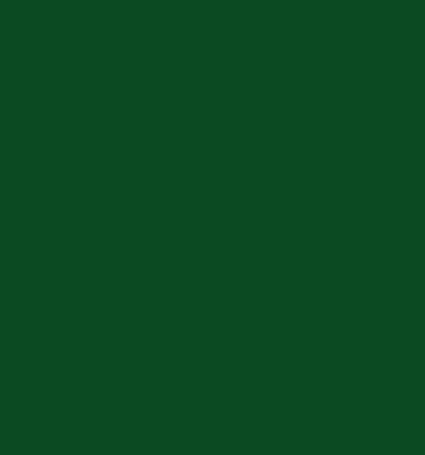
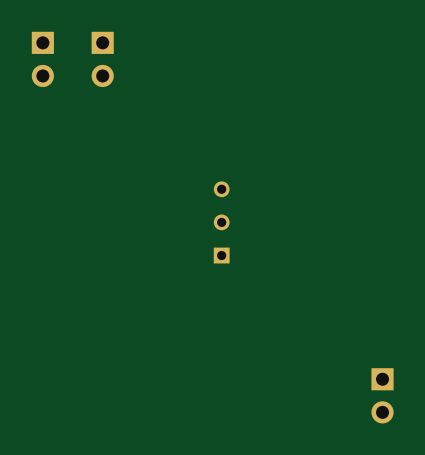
part: none -> (42, 59)
part: none -> (102, 59)
part: none -> (221, 222)
part: none -> (382, 395)

